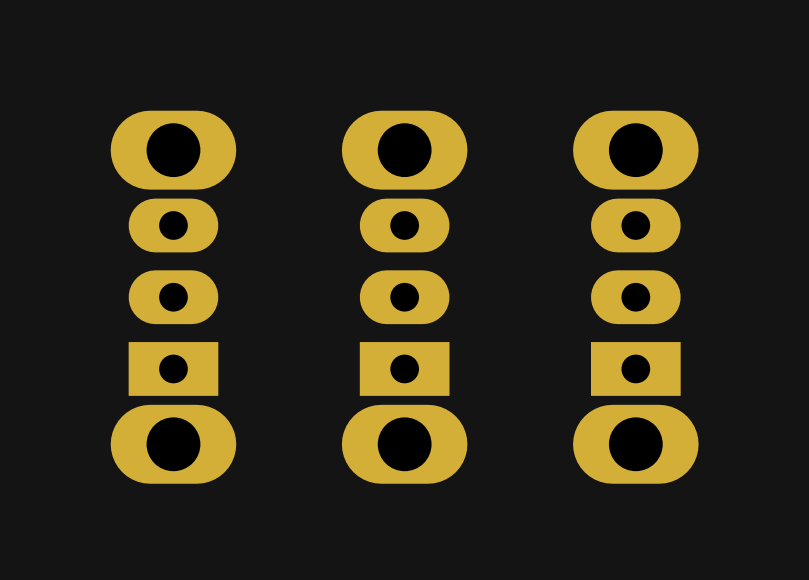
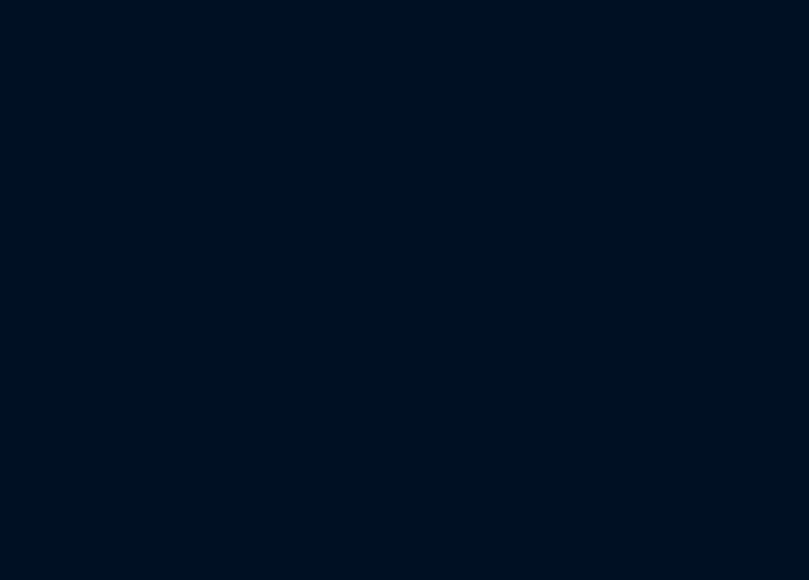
part: (173, 297) -> none
part: (404, 297) -> none
part: (635, 297) -> none

